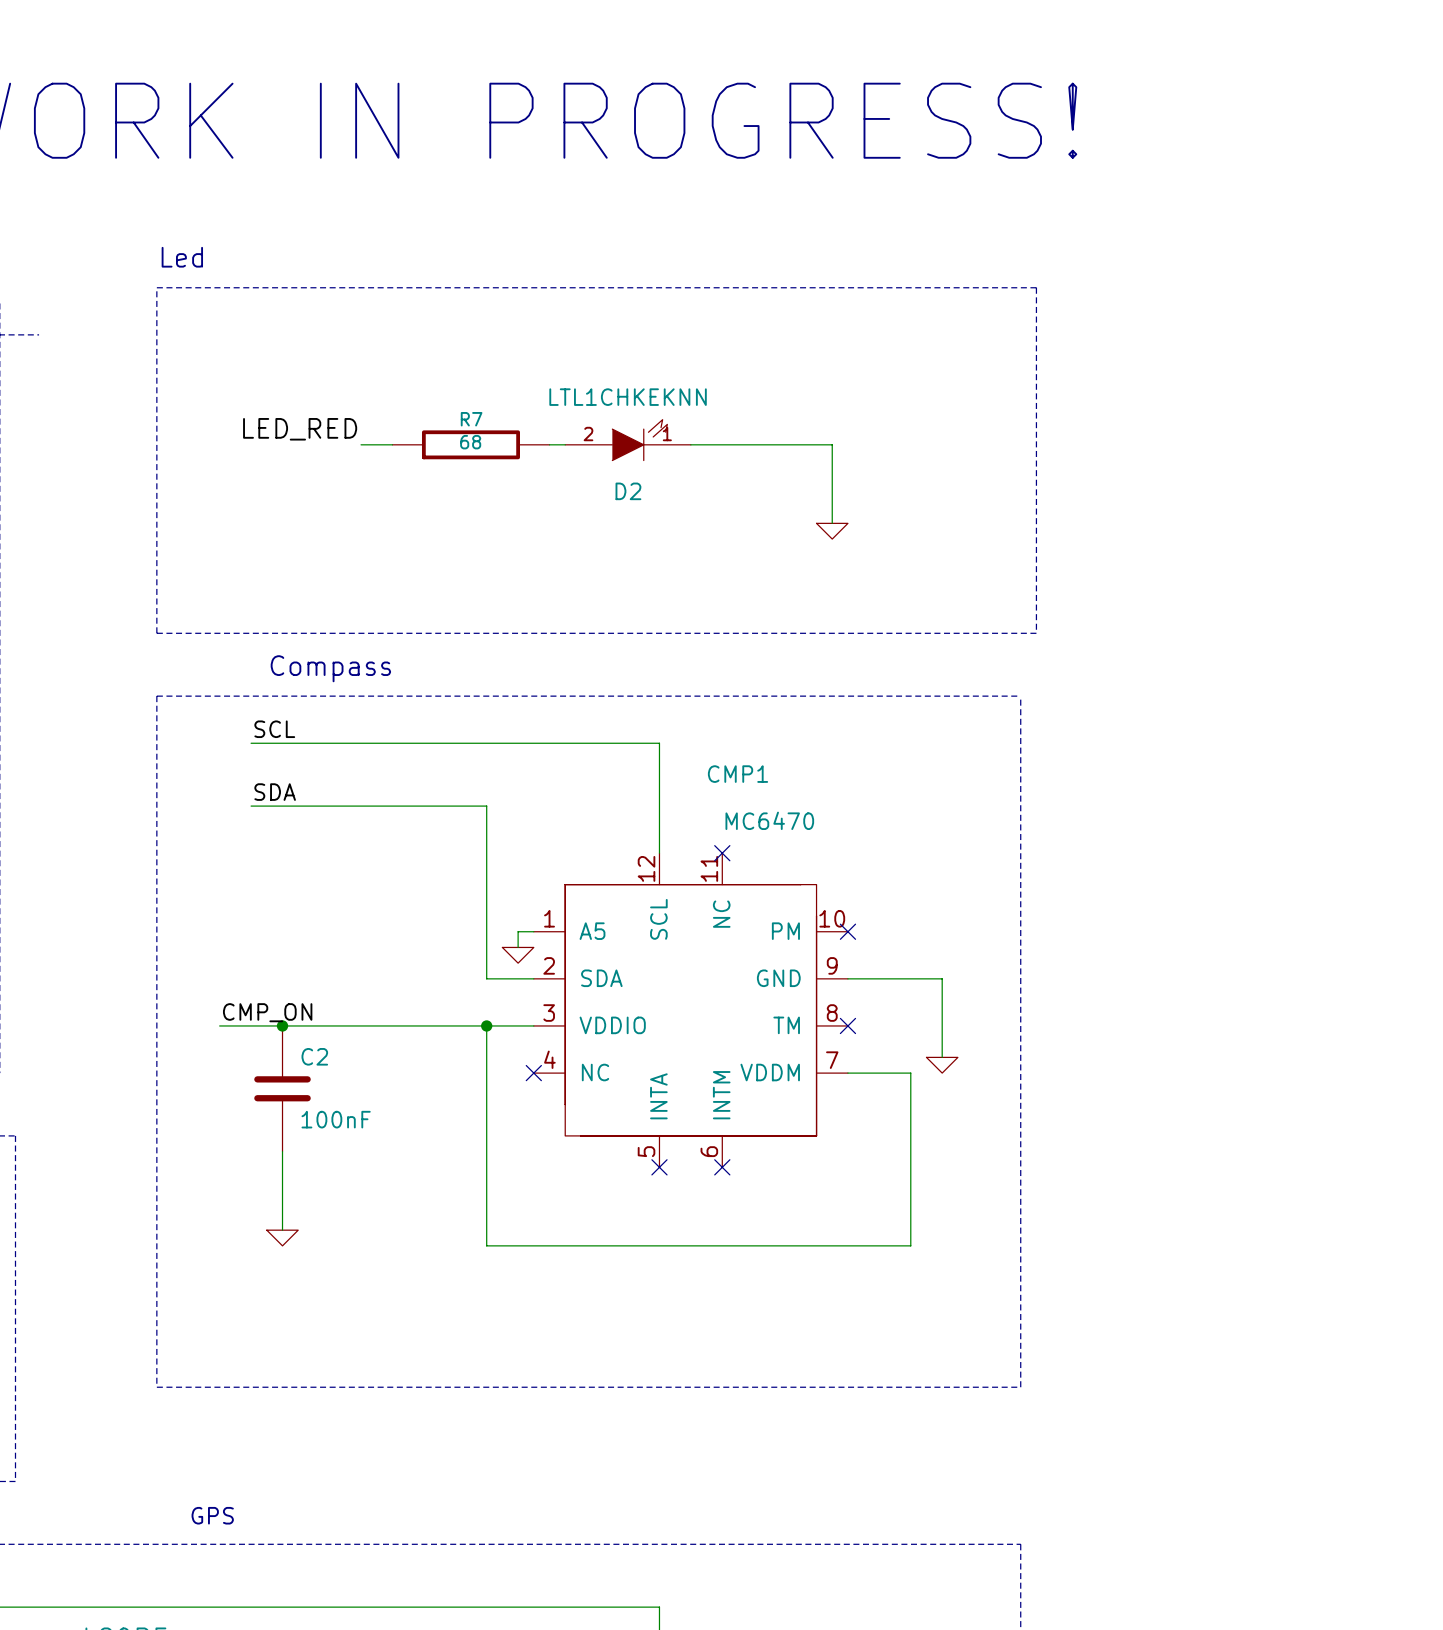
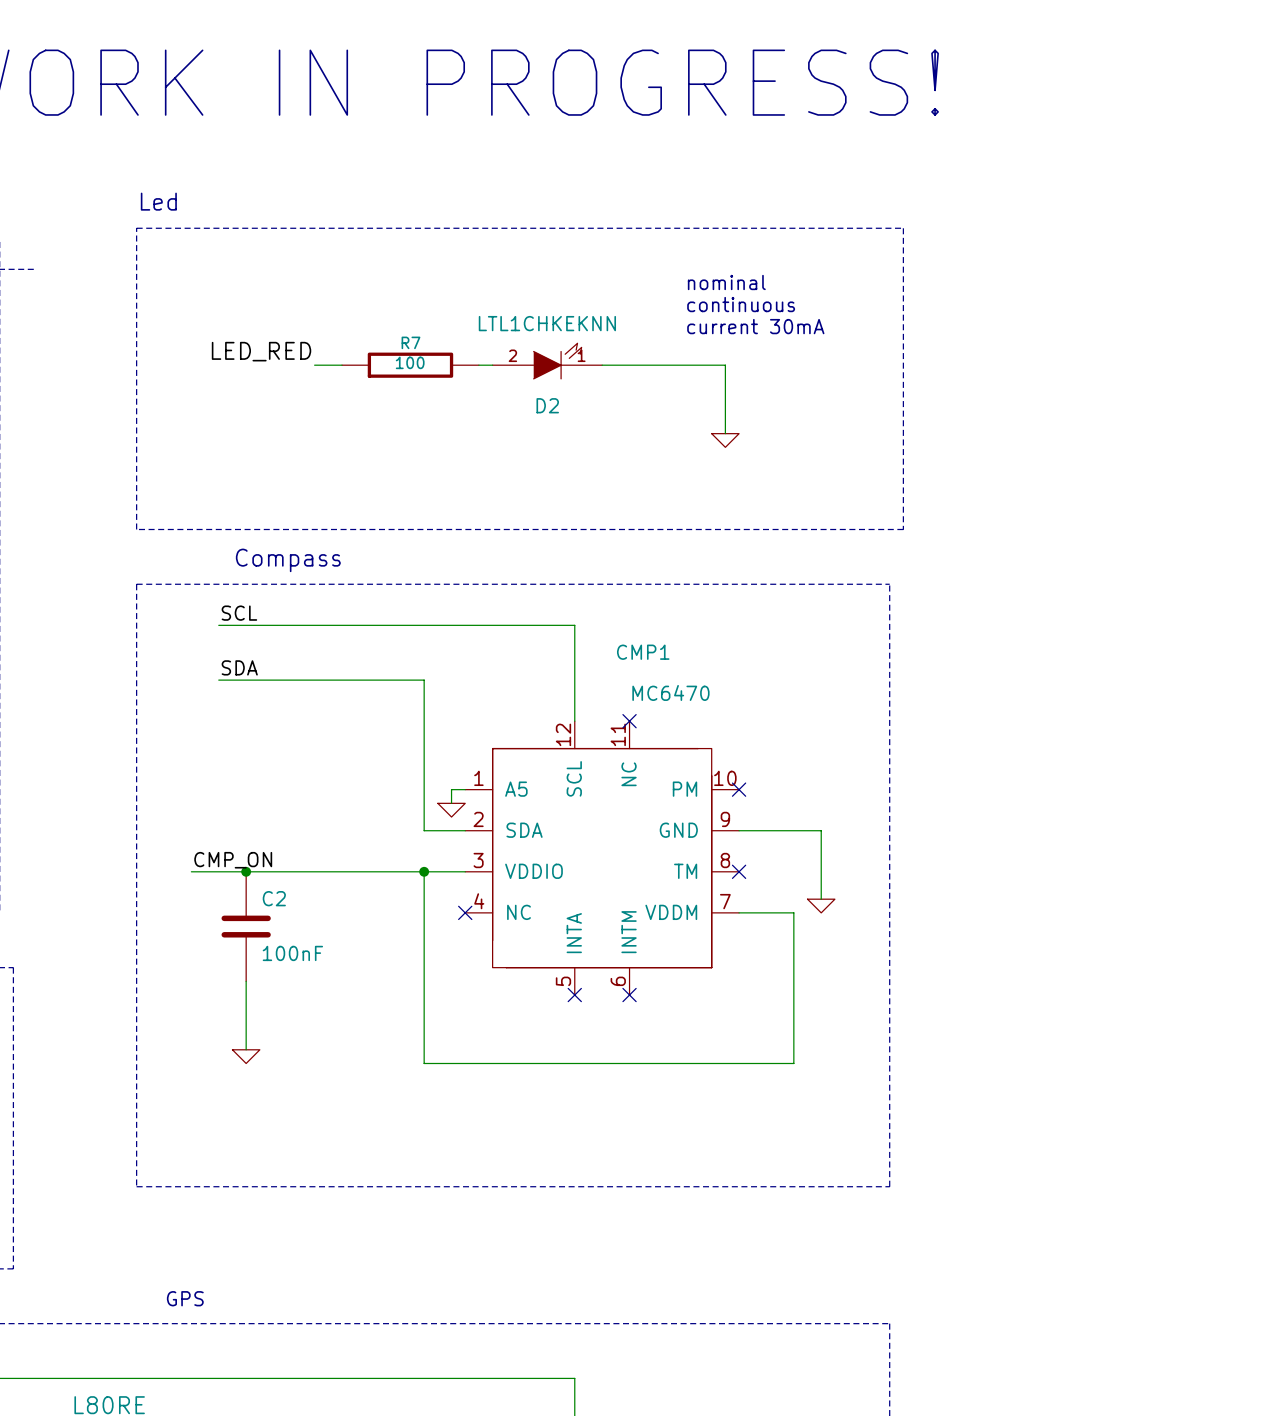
text: none -> nominal (726, 282)
text: none -> continuous (741, 304)
text: none -> current 30mA (755, 326)
R7 value: 68 (470, 442) -> 100 (410, 362)

